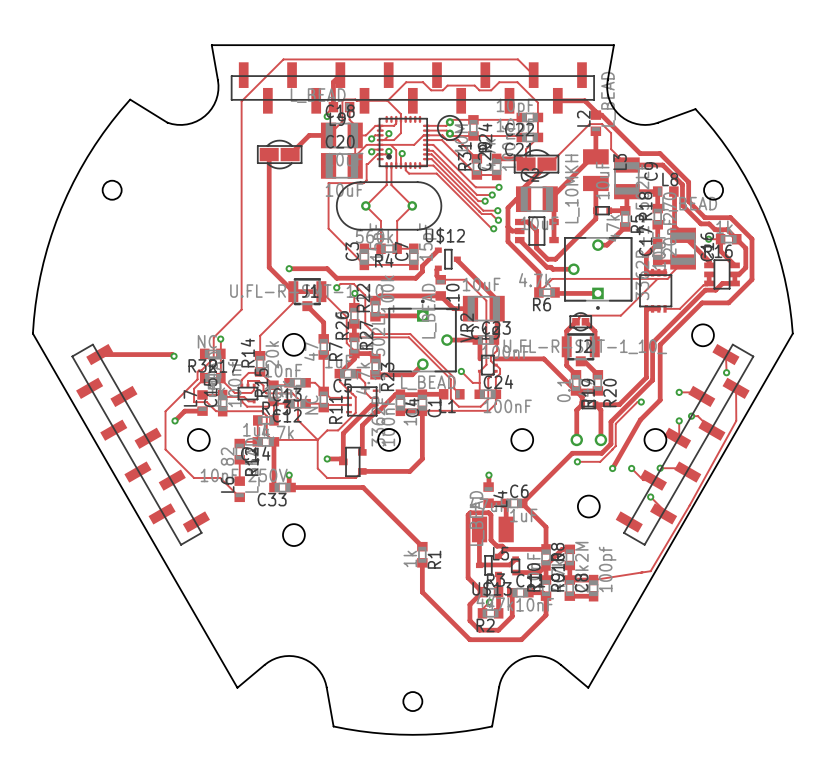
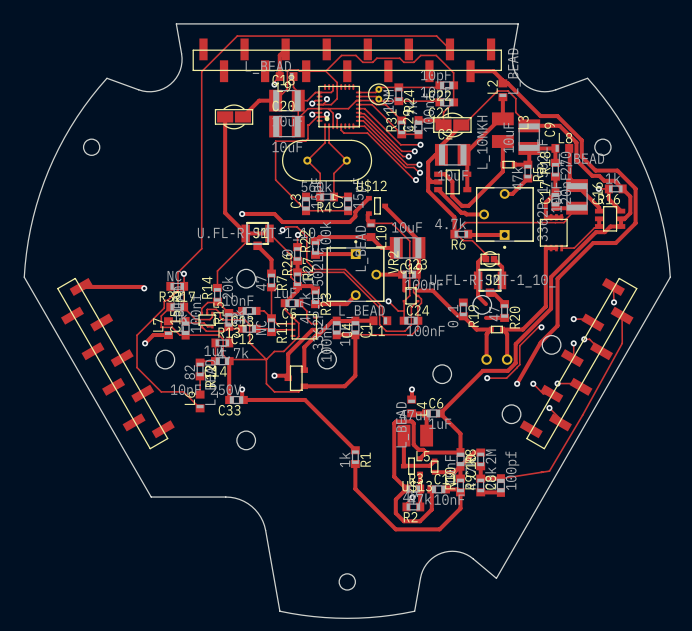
board edge: (695, 109) (713, 130) (737, 164) (763, 213) (781, 265) (787, 292) (792, 333) (588, 687) (553, 660) (540, 656) (527, 656) (512, 664) (503, 674) (499, 687) (492, 726) (426, 734) (386, 733) (333, 726) (326, 687) (322, 674) (313, 664) (297, 656) (284, 656) (272, 660) (237, 687) (32, 333) (37, 290) (51, 235) (67, 195) (95, 144) (130, 99) (167, 122) -> (587, 78) (617, 116) (645, 170) (663, 228) (670, 277) (496, 578) (466, 554) (456, 551) (444, 552) (431, 558) (424, 567) (414, 611) (358, 618) (324, 617) (279, 611) (264, 525) (258, 513) (248, 503) (230, 497) (151, 497) (24, 277) (28, 240) (40, 193) (53, 159) (70, 127) (106, 78) (138, 89)
track: (657, 278) (620, 315) (580, 315) (566, 331) -> (454, 234) (463, 240) (472, 240) (485, 254) (478, 262) (478, 266)
round board edge: [692, 324, 714, 347] -> none
track: (513, 358) (543, 358) (582, 397) (582, 404) -> (432, 290) (458, 316) (463, 316) (476, 329) (491, 329)
round board edge: none -> [472, 295, 492, 315]
R19 position: (575, 382) -> (463, 309)
round board edge position: (522, 439) -> (442, 374)
round board edge position: (655, 439) -> (551, 344)
round board edge position: (588, 506) -> (511, 414)

